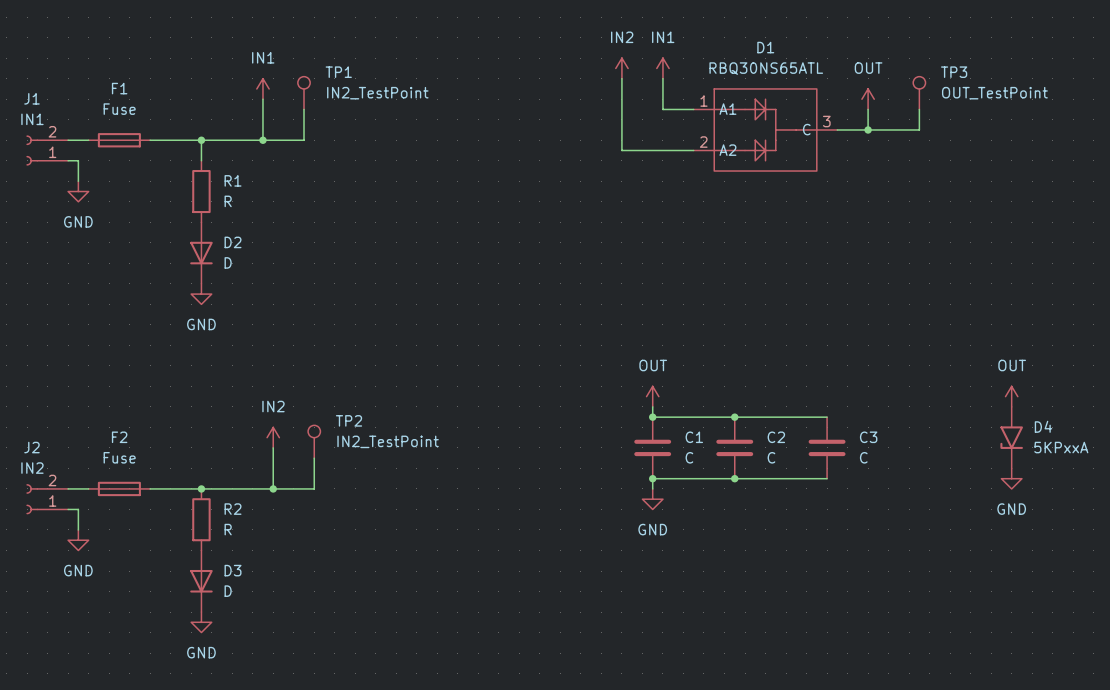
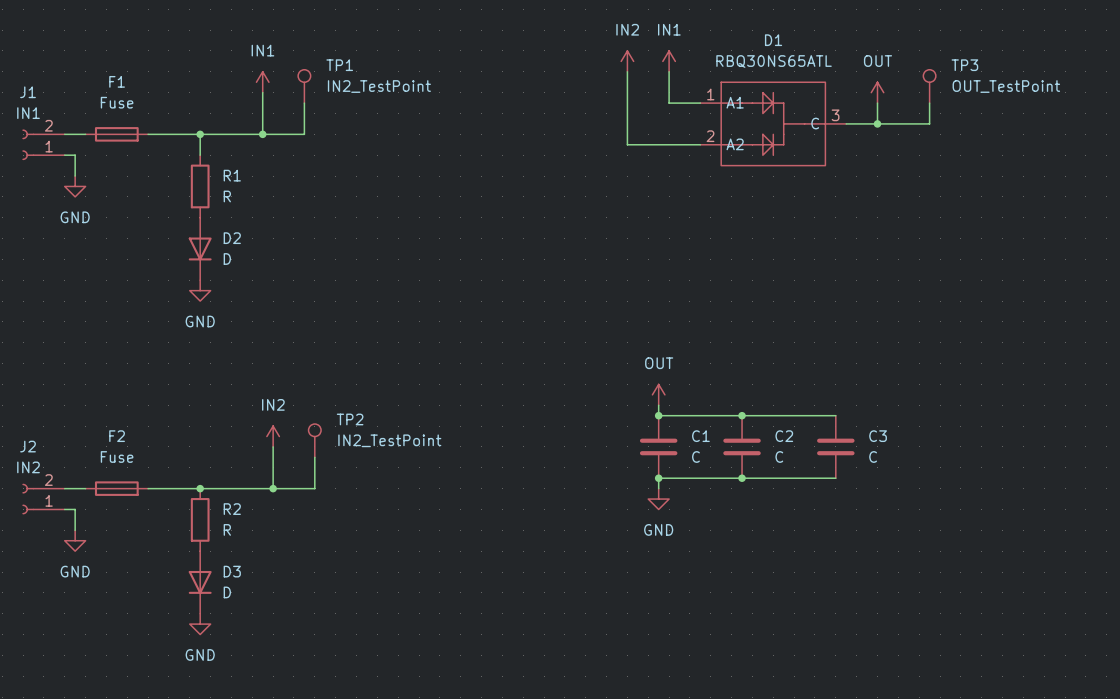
power symbol: OUT (1011, 396) -> none
D4: 5KPxxA (1011, 437) -> none
power symbol: GND (1011, 478) -> none

